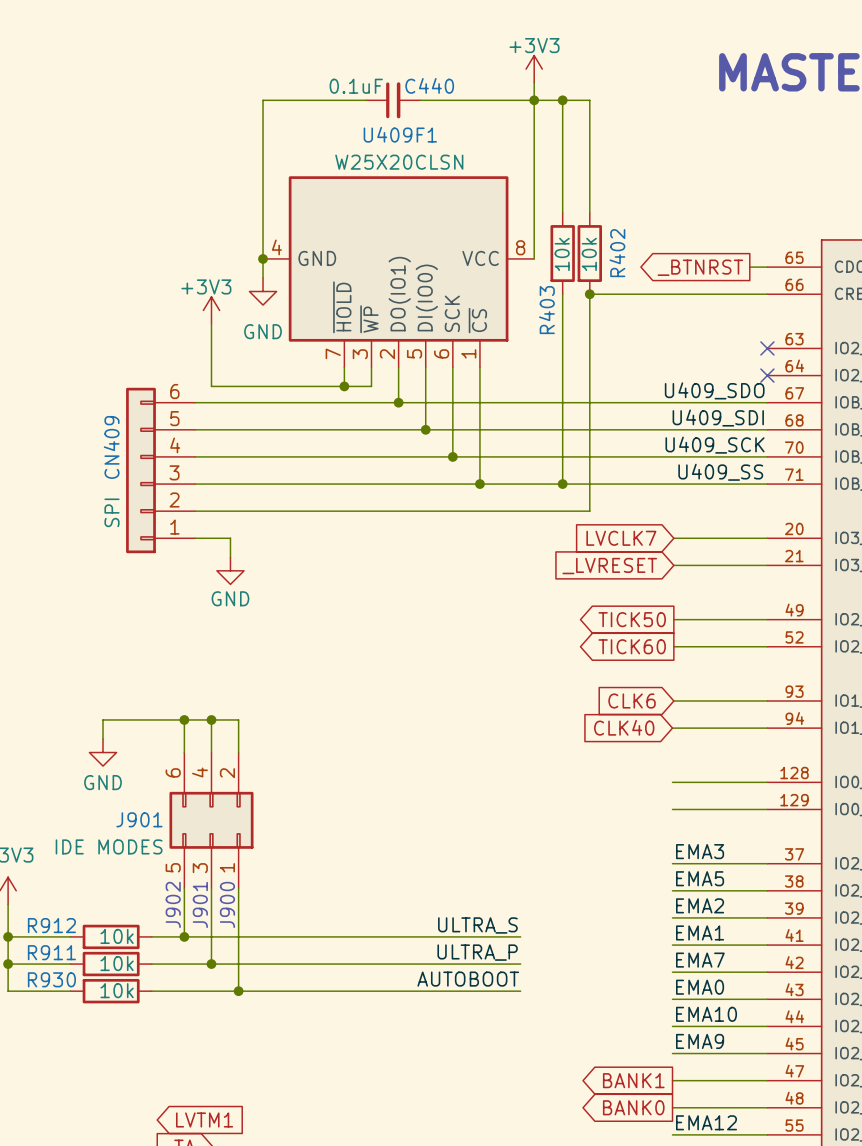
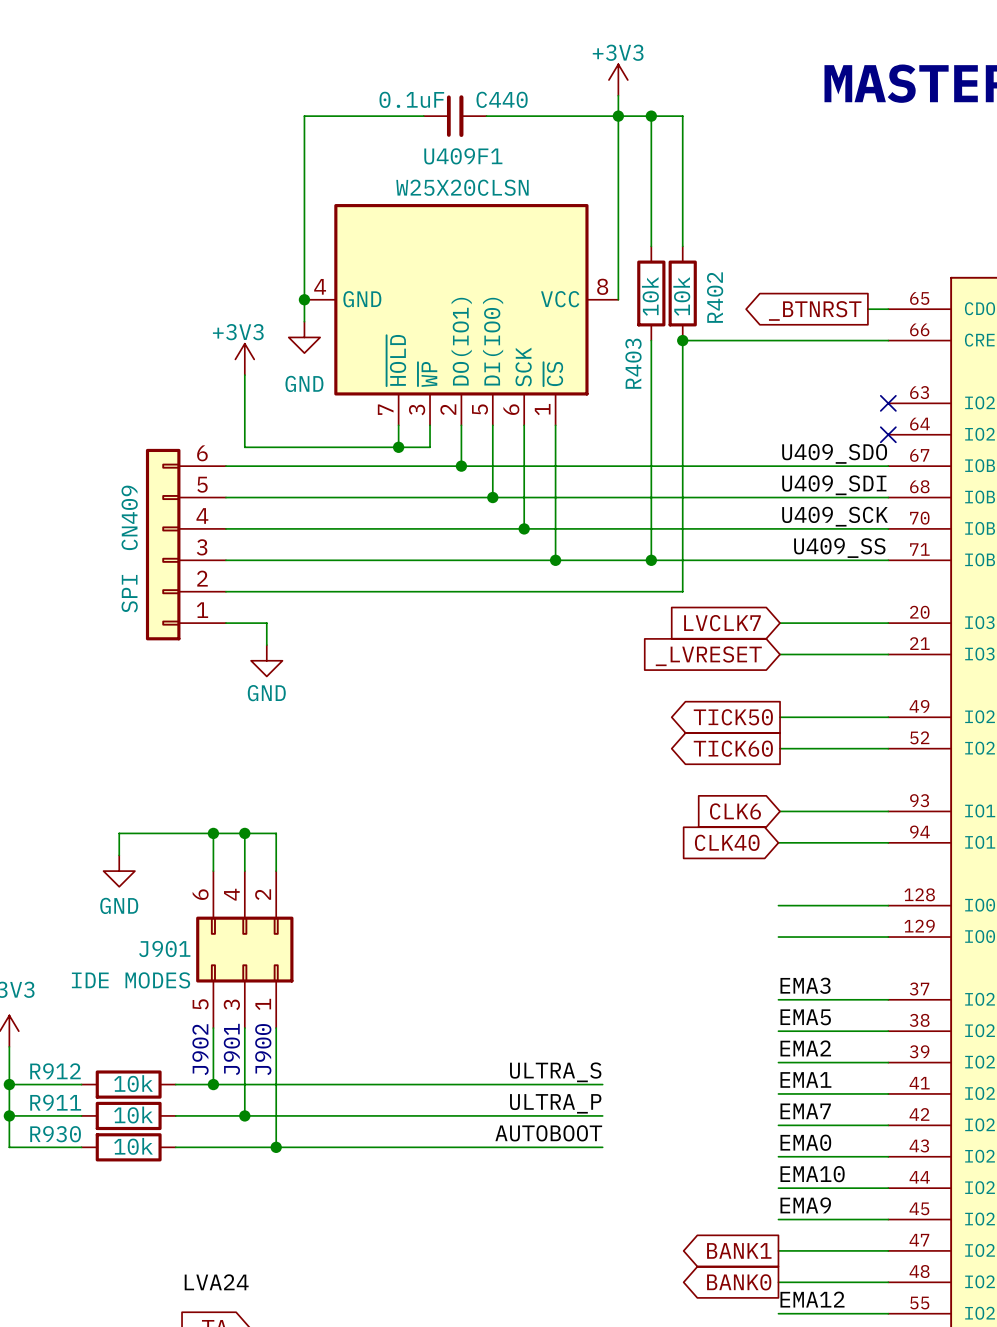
label: none -> LVA24 (216, 1282)
global label: LVTM1 (204, 1119) -> none

